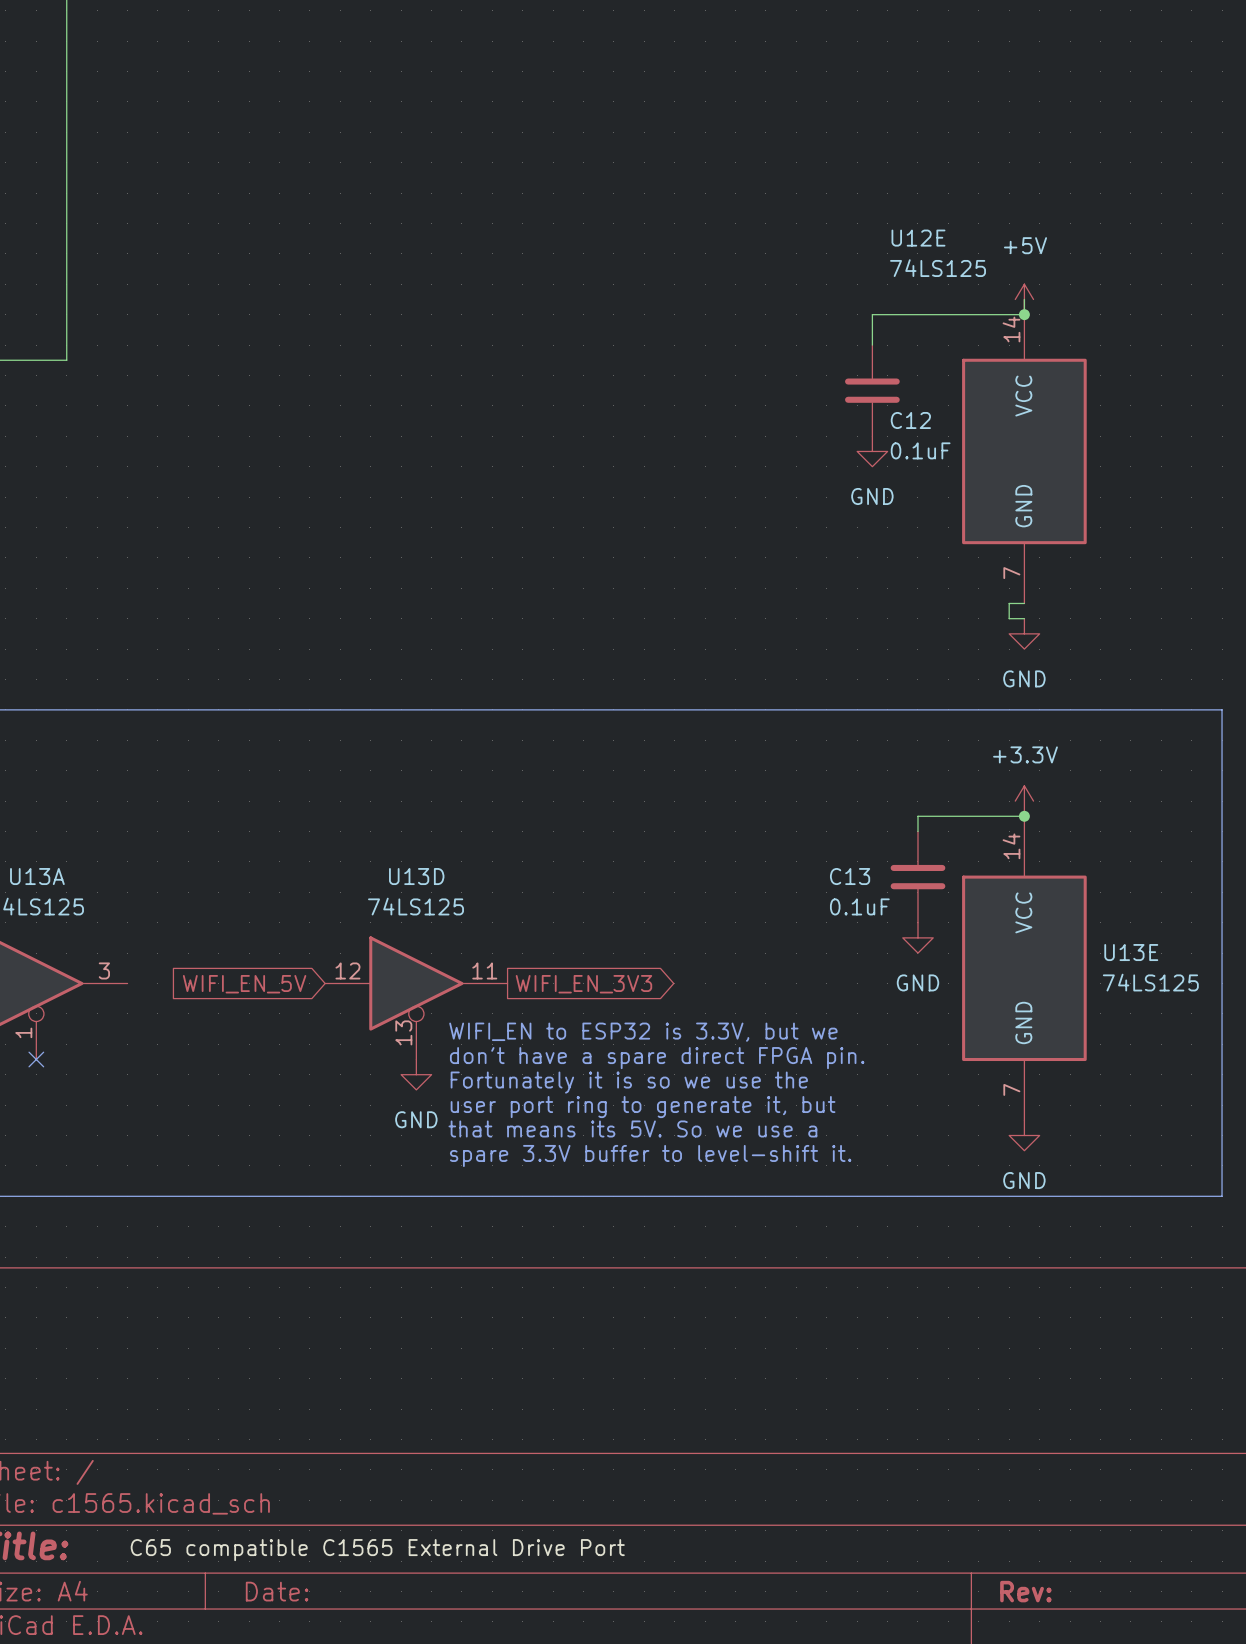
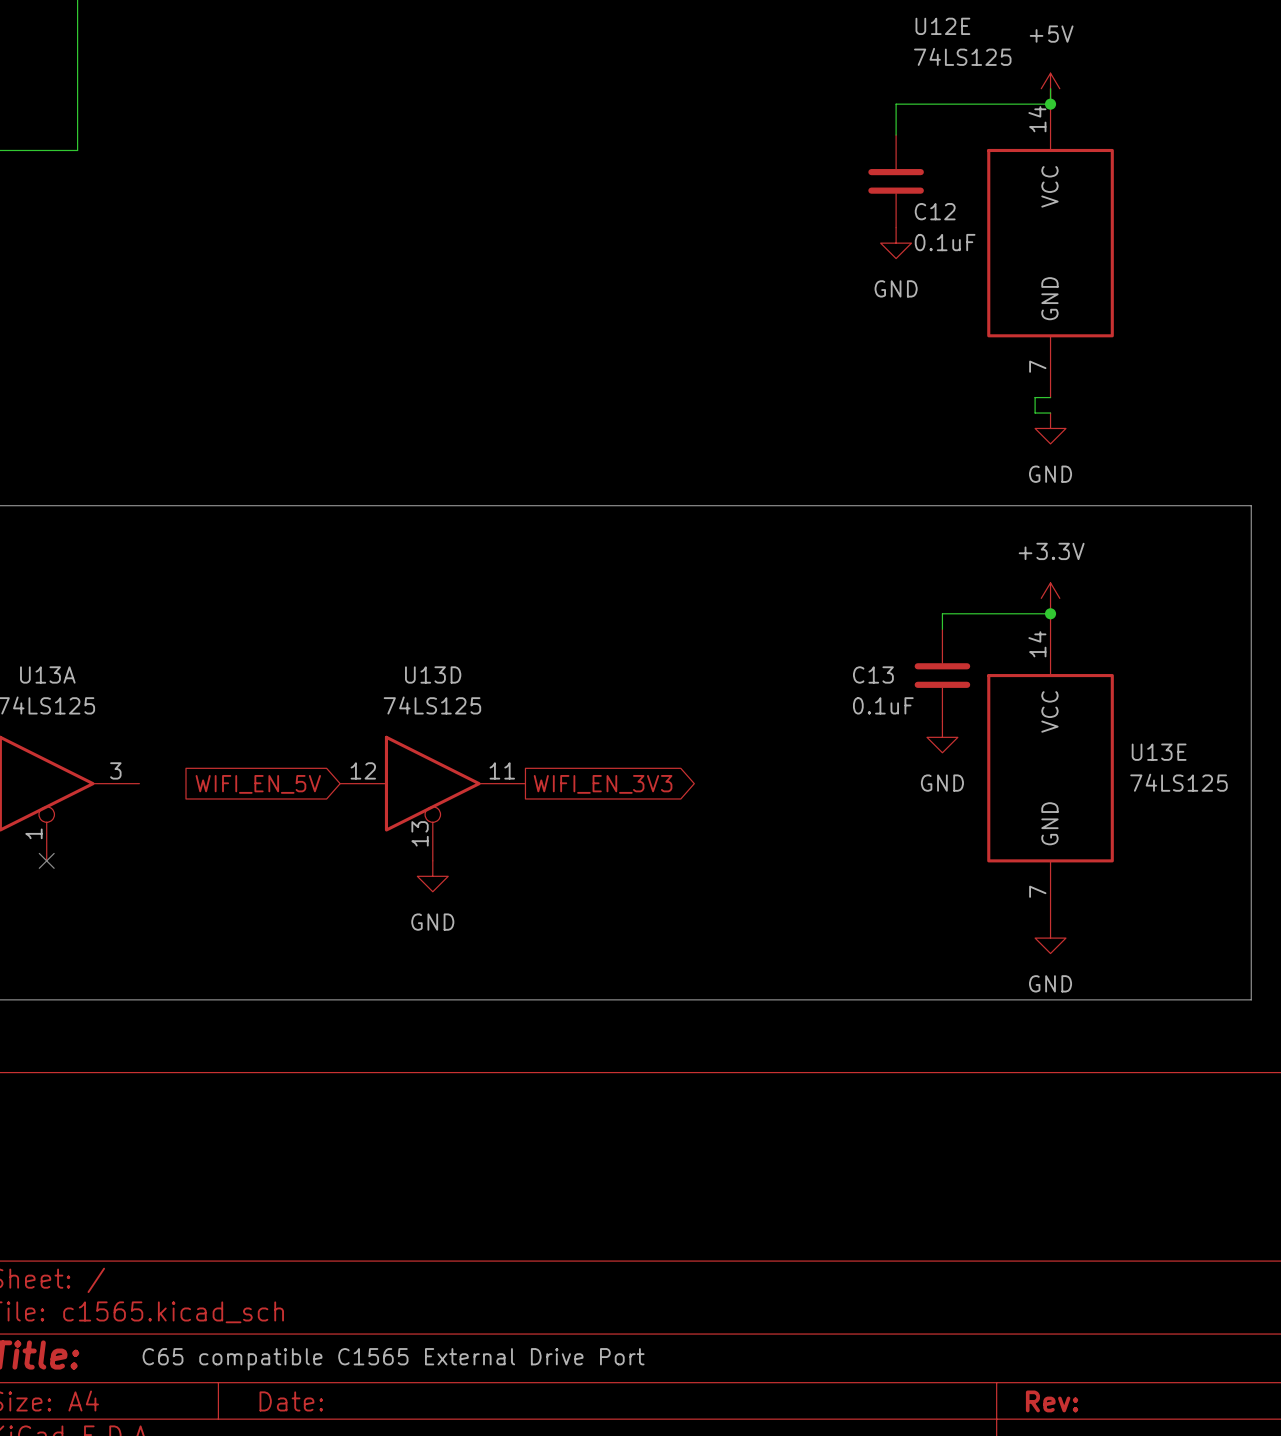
text: WIFI_EN to ESP32 is 3.3V, but we (643, 1032) -> none
text: don't have a spare direct FPGA pin. (657, 1058) -> none
text: Fortunately it is so we use the (629, 1082) -> none
text: user port ring to generate it, but (643, 1107) -> none
text: that means its 5V. So we use a (632, 1128) -> none
text: spare 3.3V buffer to level-shift it. (650, 1155) -> none

